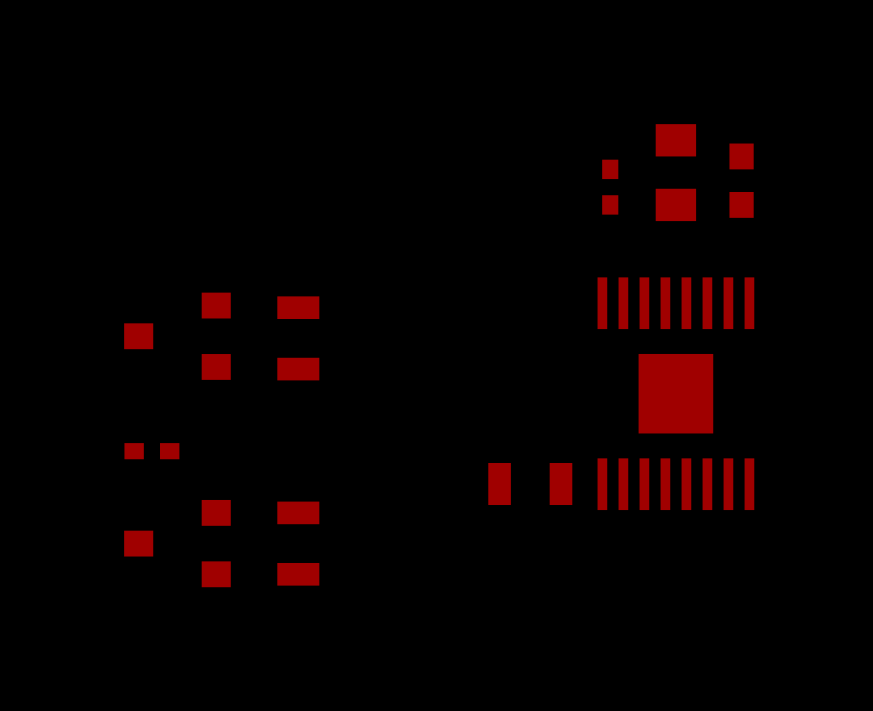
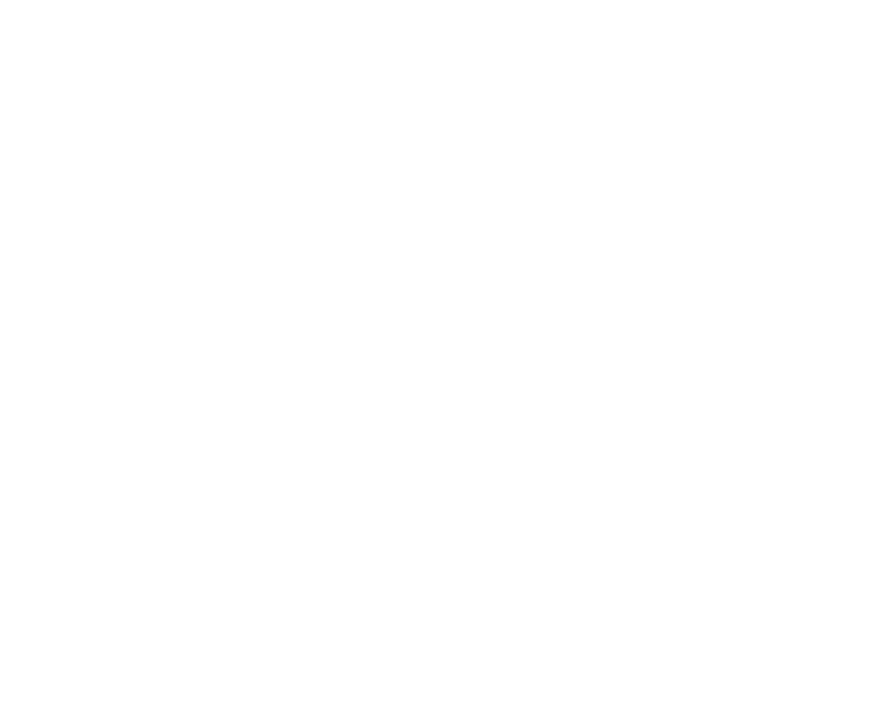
part: (675, 172) -> none
part: (741, 180) -> none
part: (610, 187) -> none
part: (177, 336) -> none
part: (298, 338) -> none
part: (675, 393) -> none
part: (151, 451) -> none
part: (530, 484) -> none
part: (177, 543) -> none
part: (298, 543) -> none

